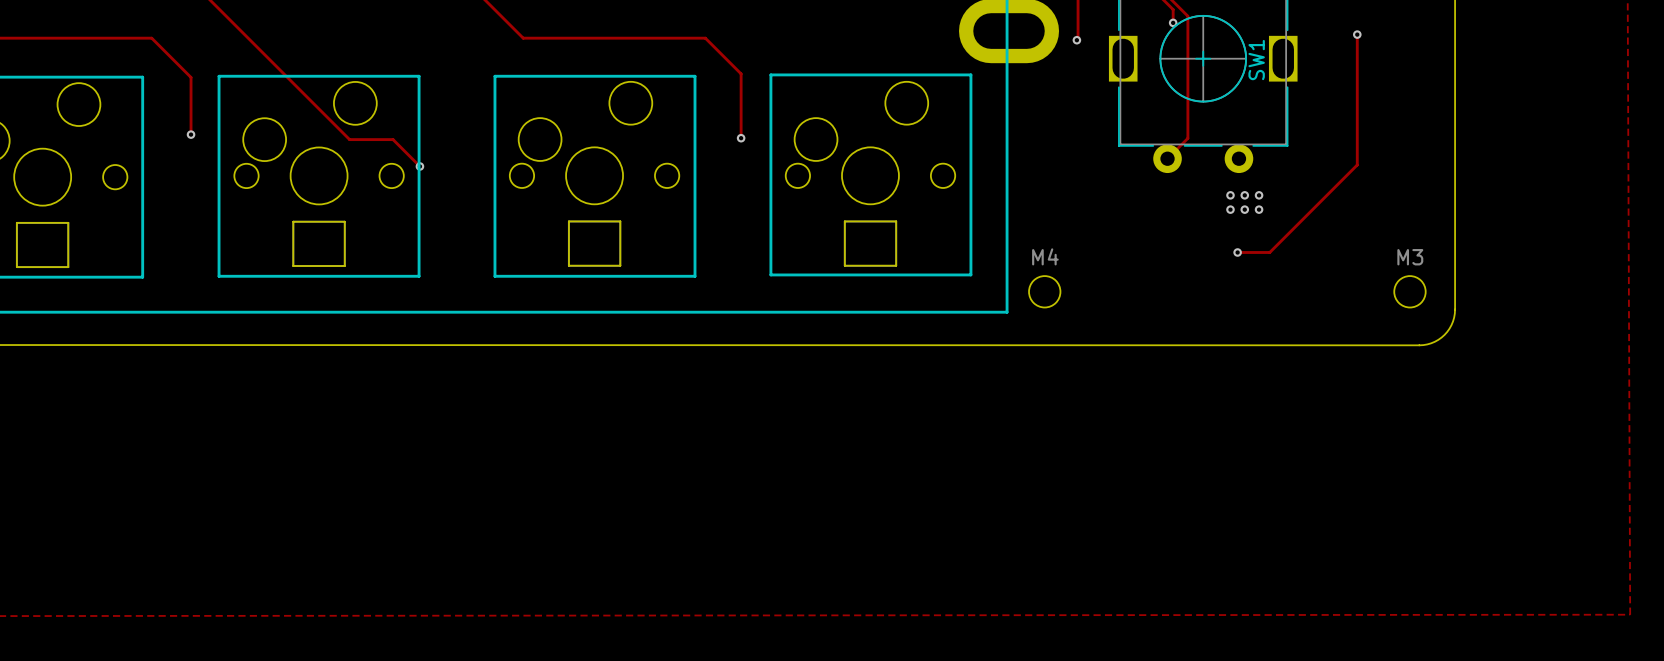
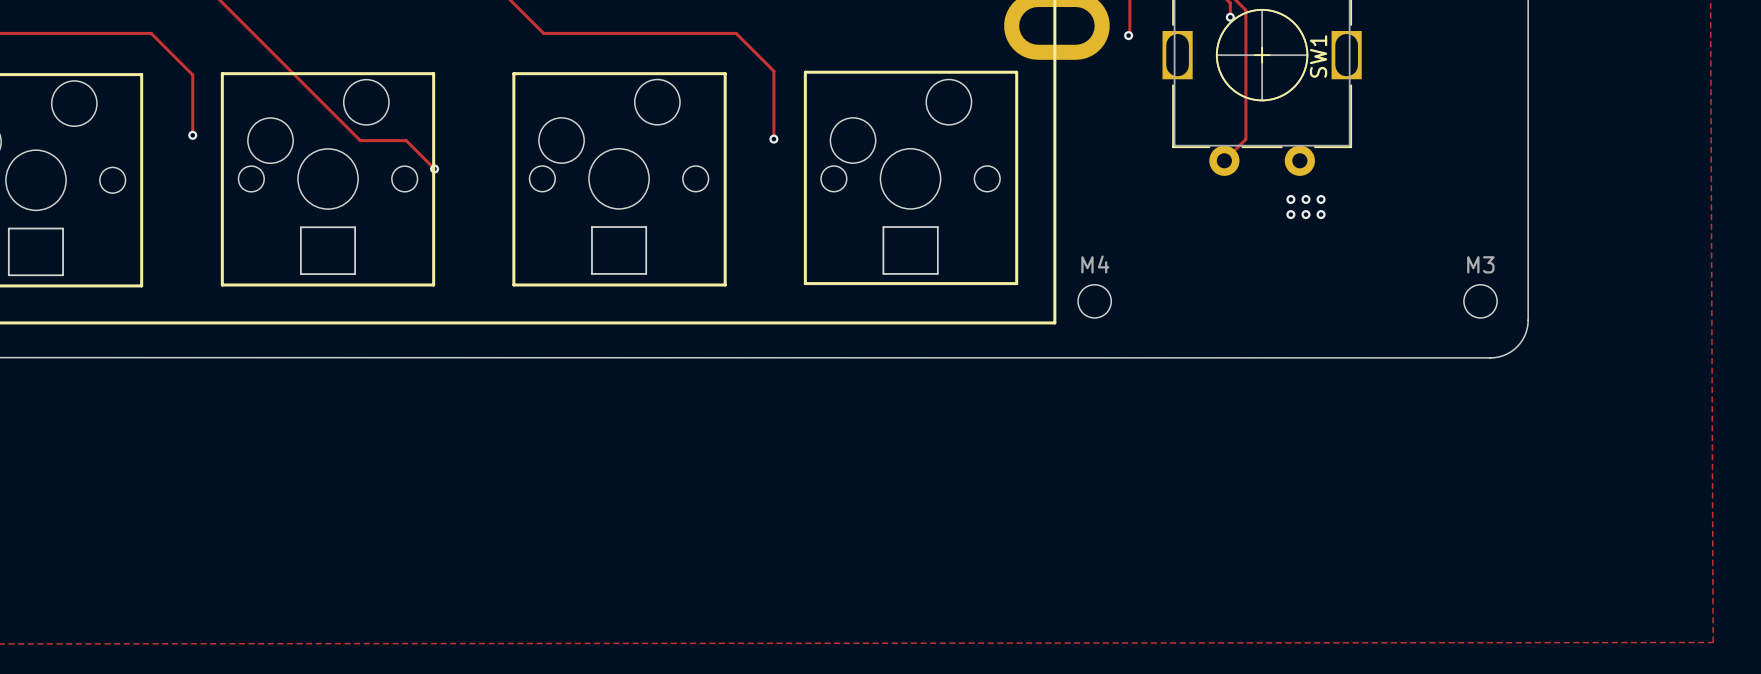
track: (1357, 34) (1357, 164) (1269, 252) (1237, 252) -> none
via: (1357, 34) -> none
via: (1237, 252) -> none

